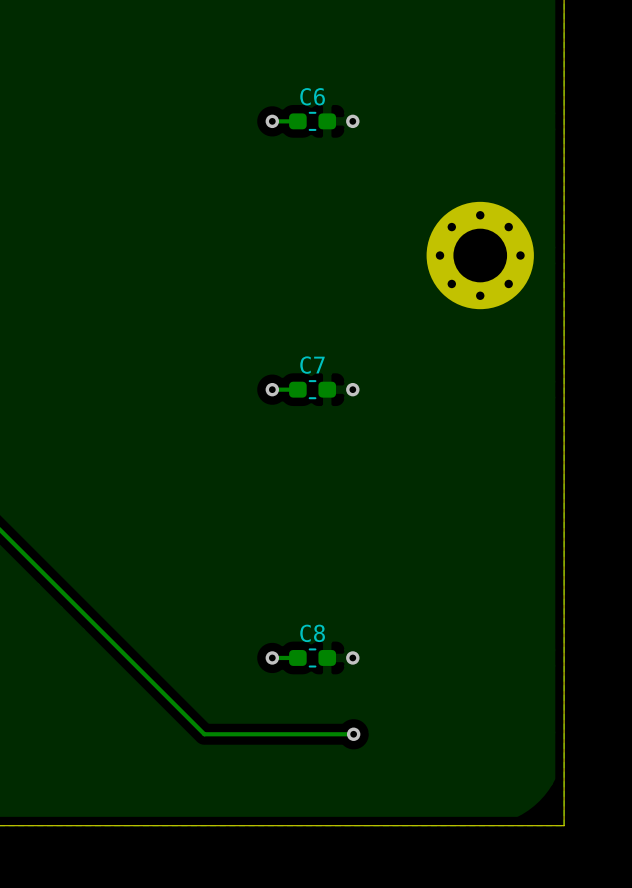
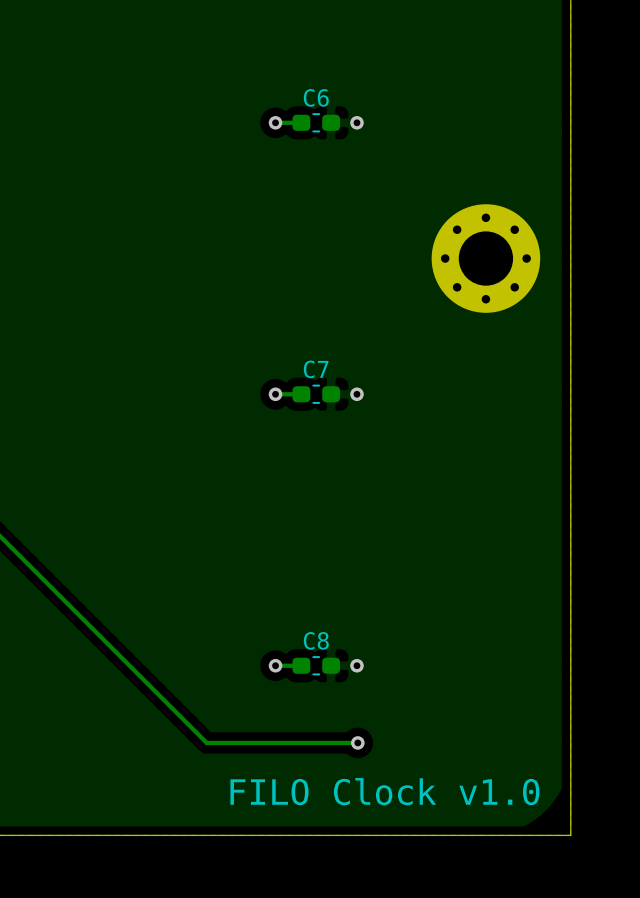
text: none -> FILO Clock v1.0 (384, 791)

